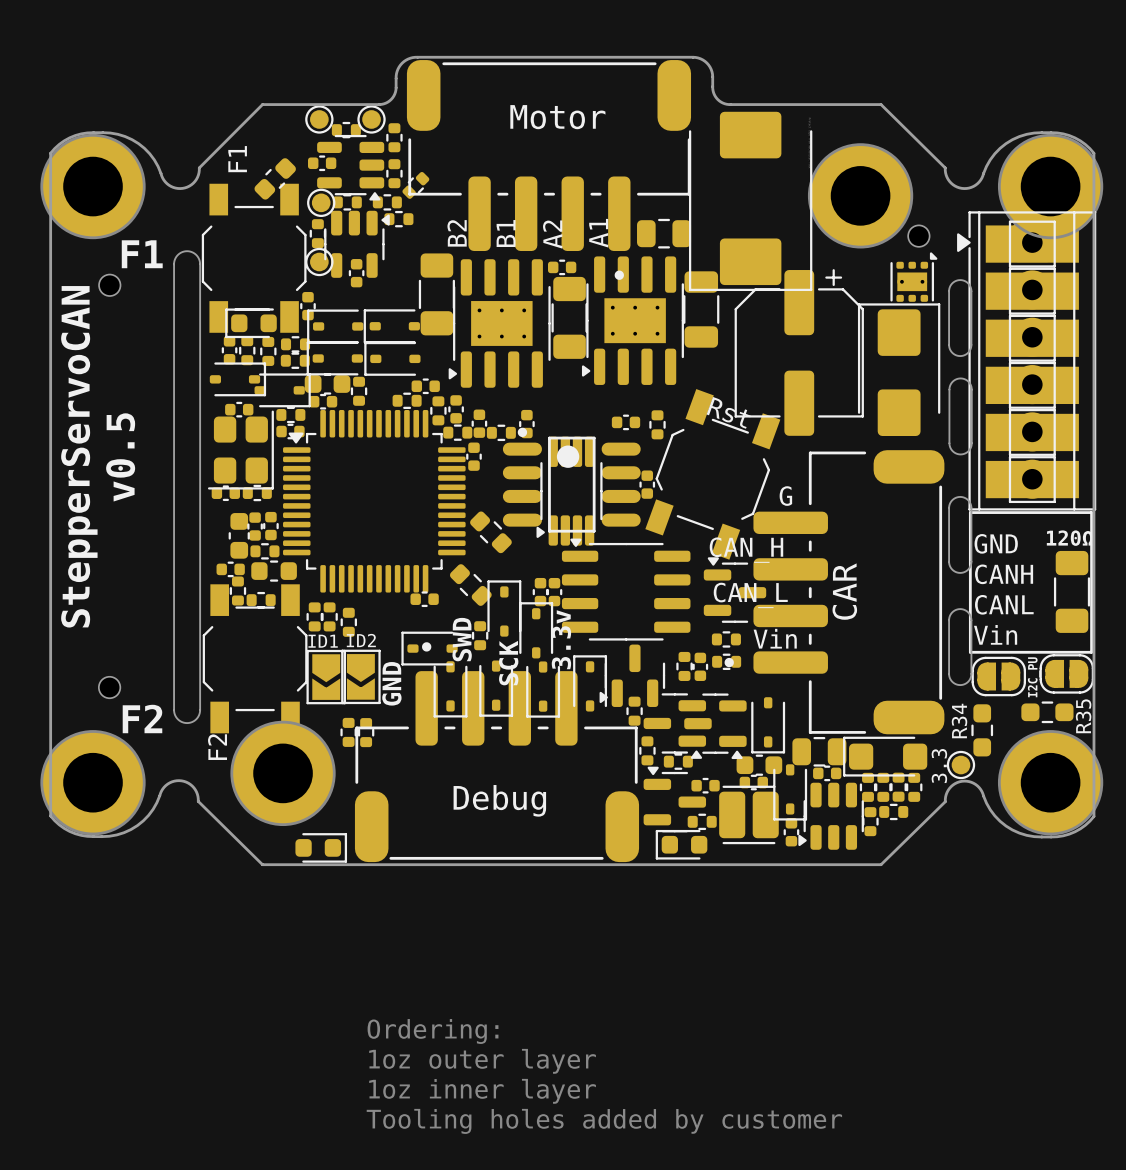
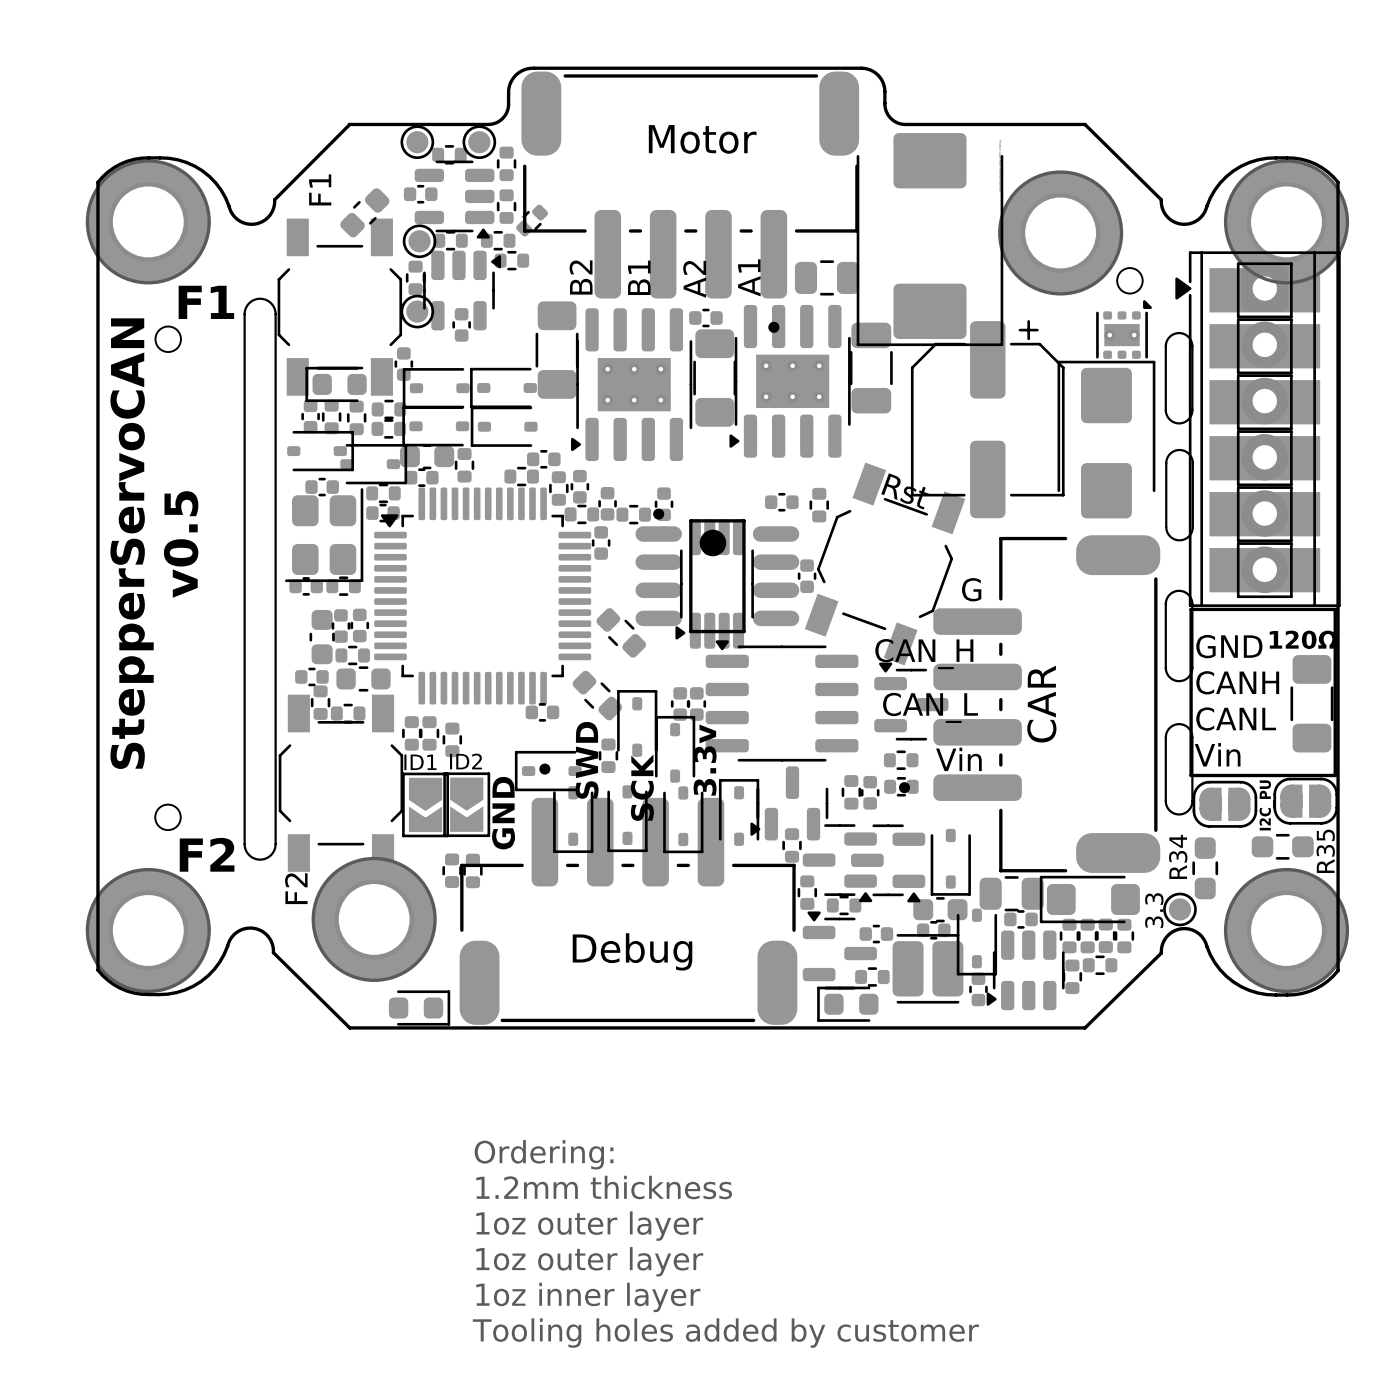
text: none -> Ordering: (544, 1154)
text: none -> 1.2mm thickness (604, 1187)
text: Ordering: (433, 1031) -> 1oz outer layer (589, 1226)

